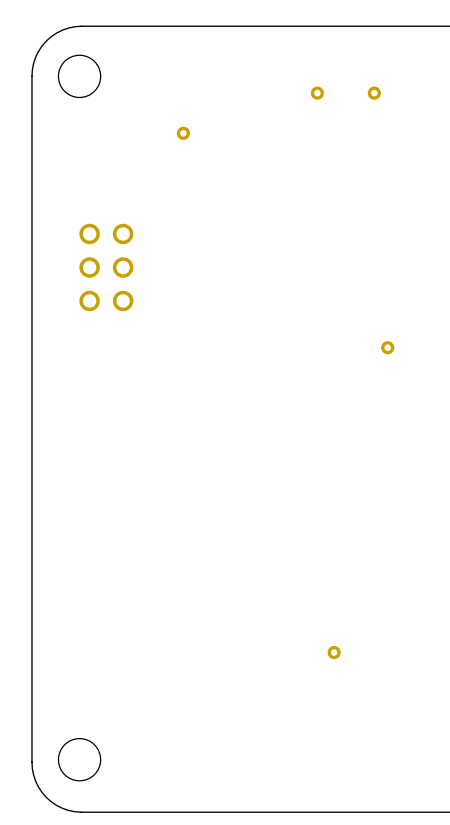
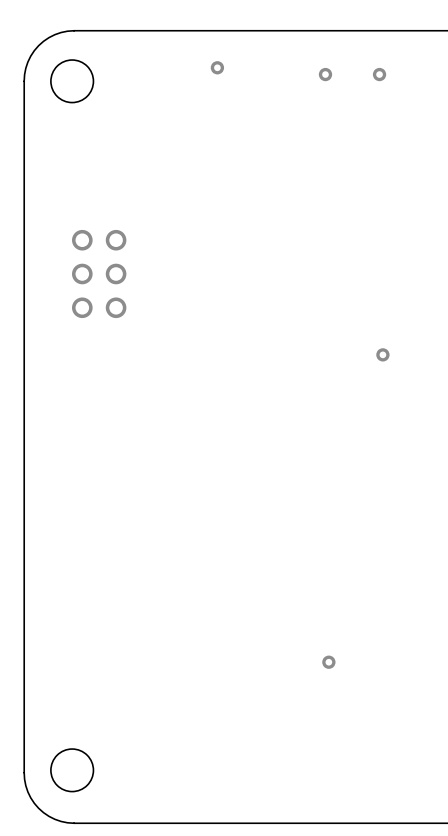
part: none -> (217, 67)
part: none -> (325, 74)
part: none -> (379, 74)
part: (317, 93) -> none
part: (374, 93) -> none
part: (183, 133) -> none

